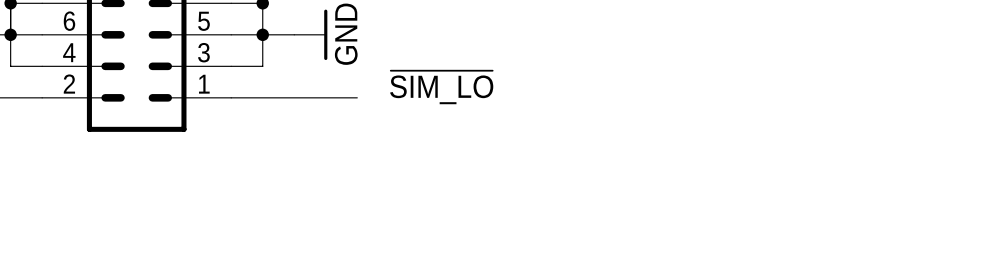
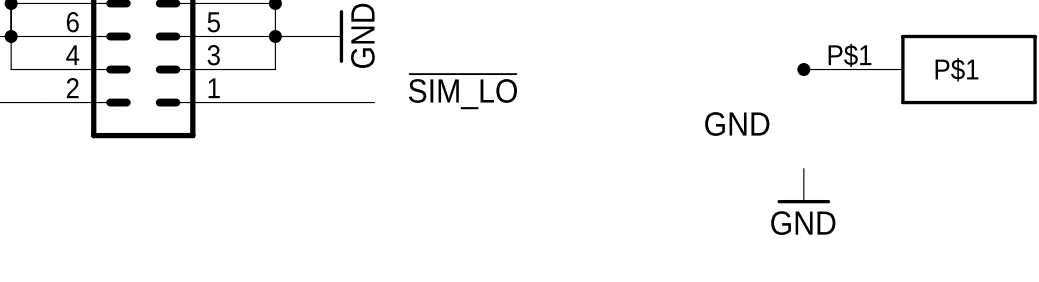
wire: none -> (803, 69) (836, 69)
junction: none -> (803, 69)
part: none -> (936, 69)
label: none -> GND (737, 124)
power symbol: none -> GND (803, 185)

